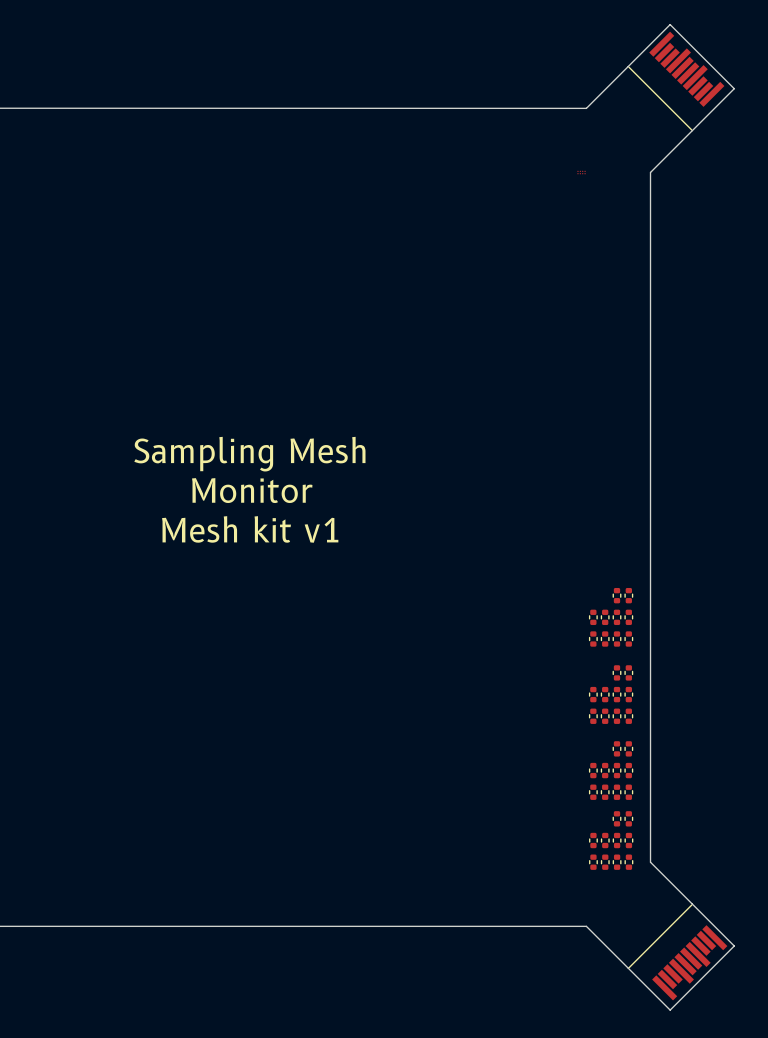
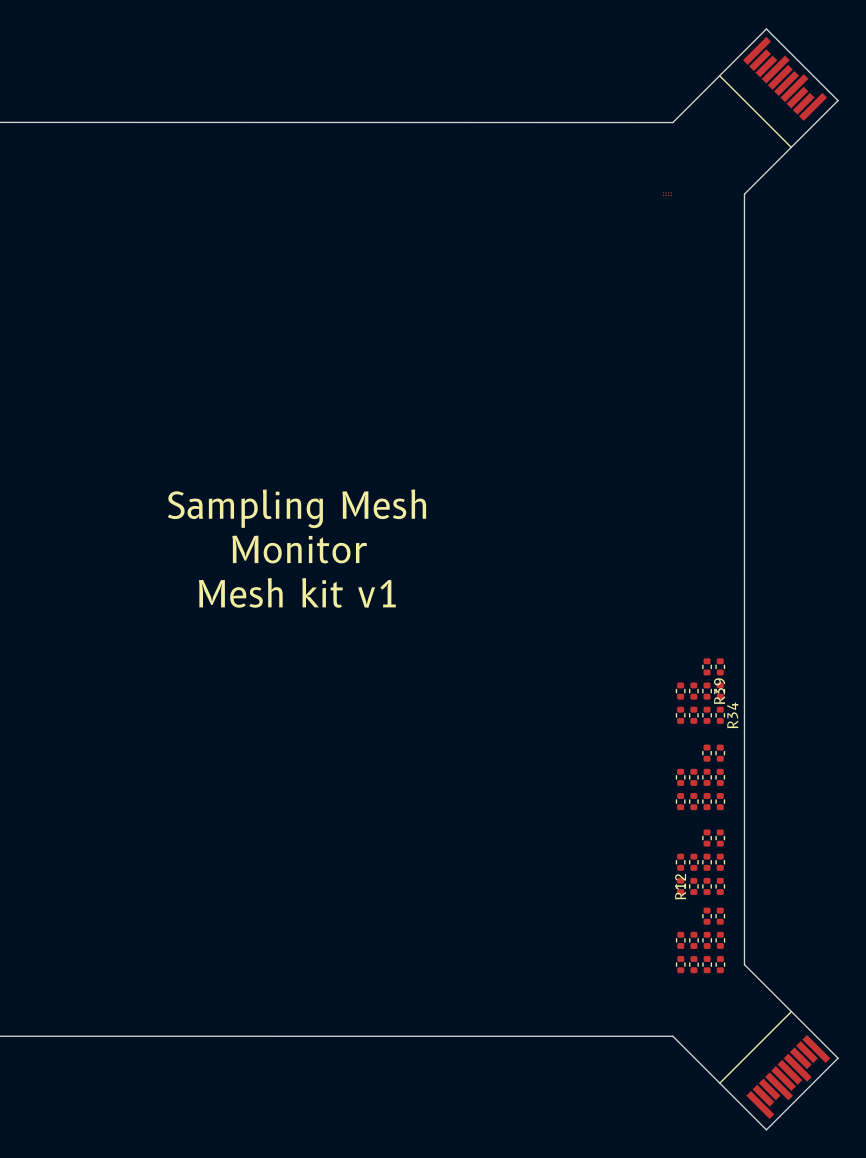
R39 name: none -> R39 (719, 691)
R34 name: none -> R34 (732, 715)
R12 name: none -> R12 (680, 886)

